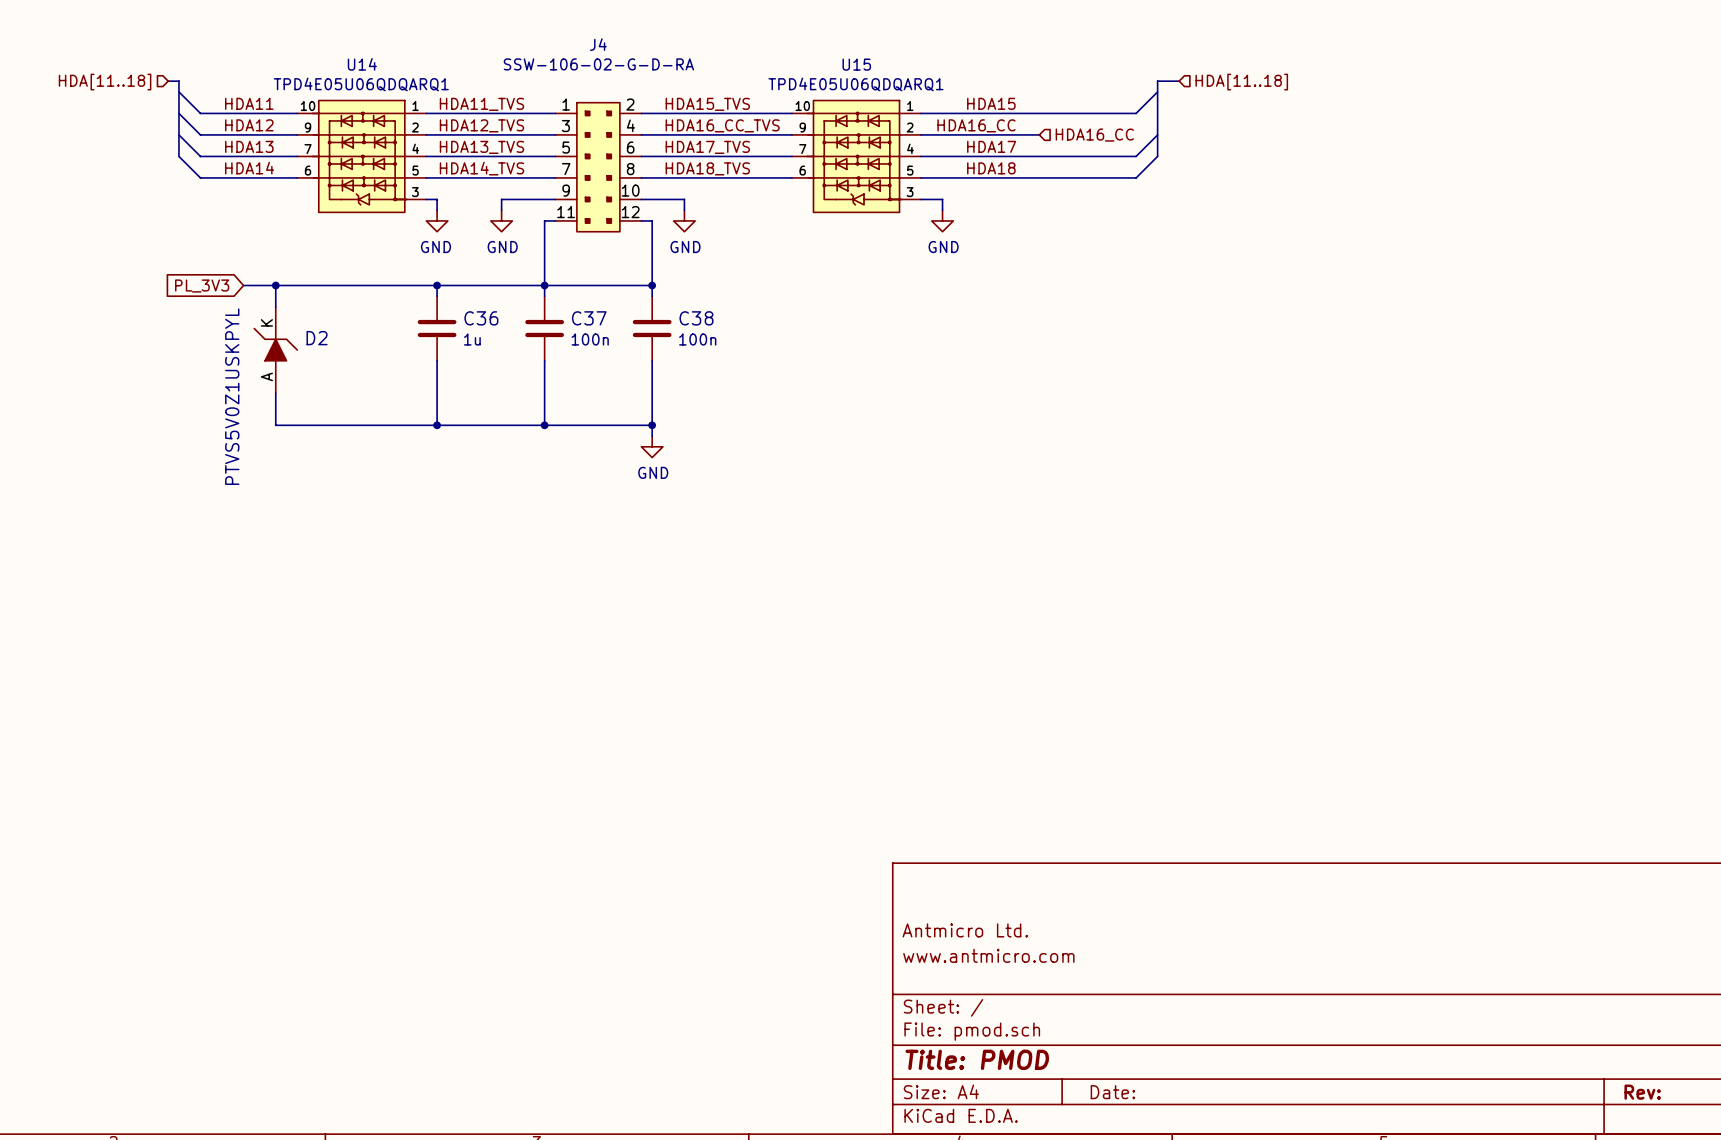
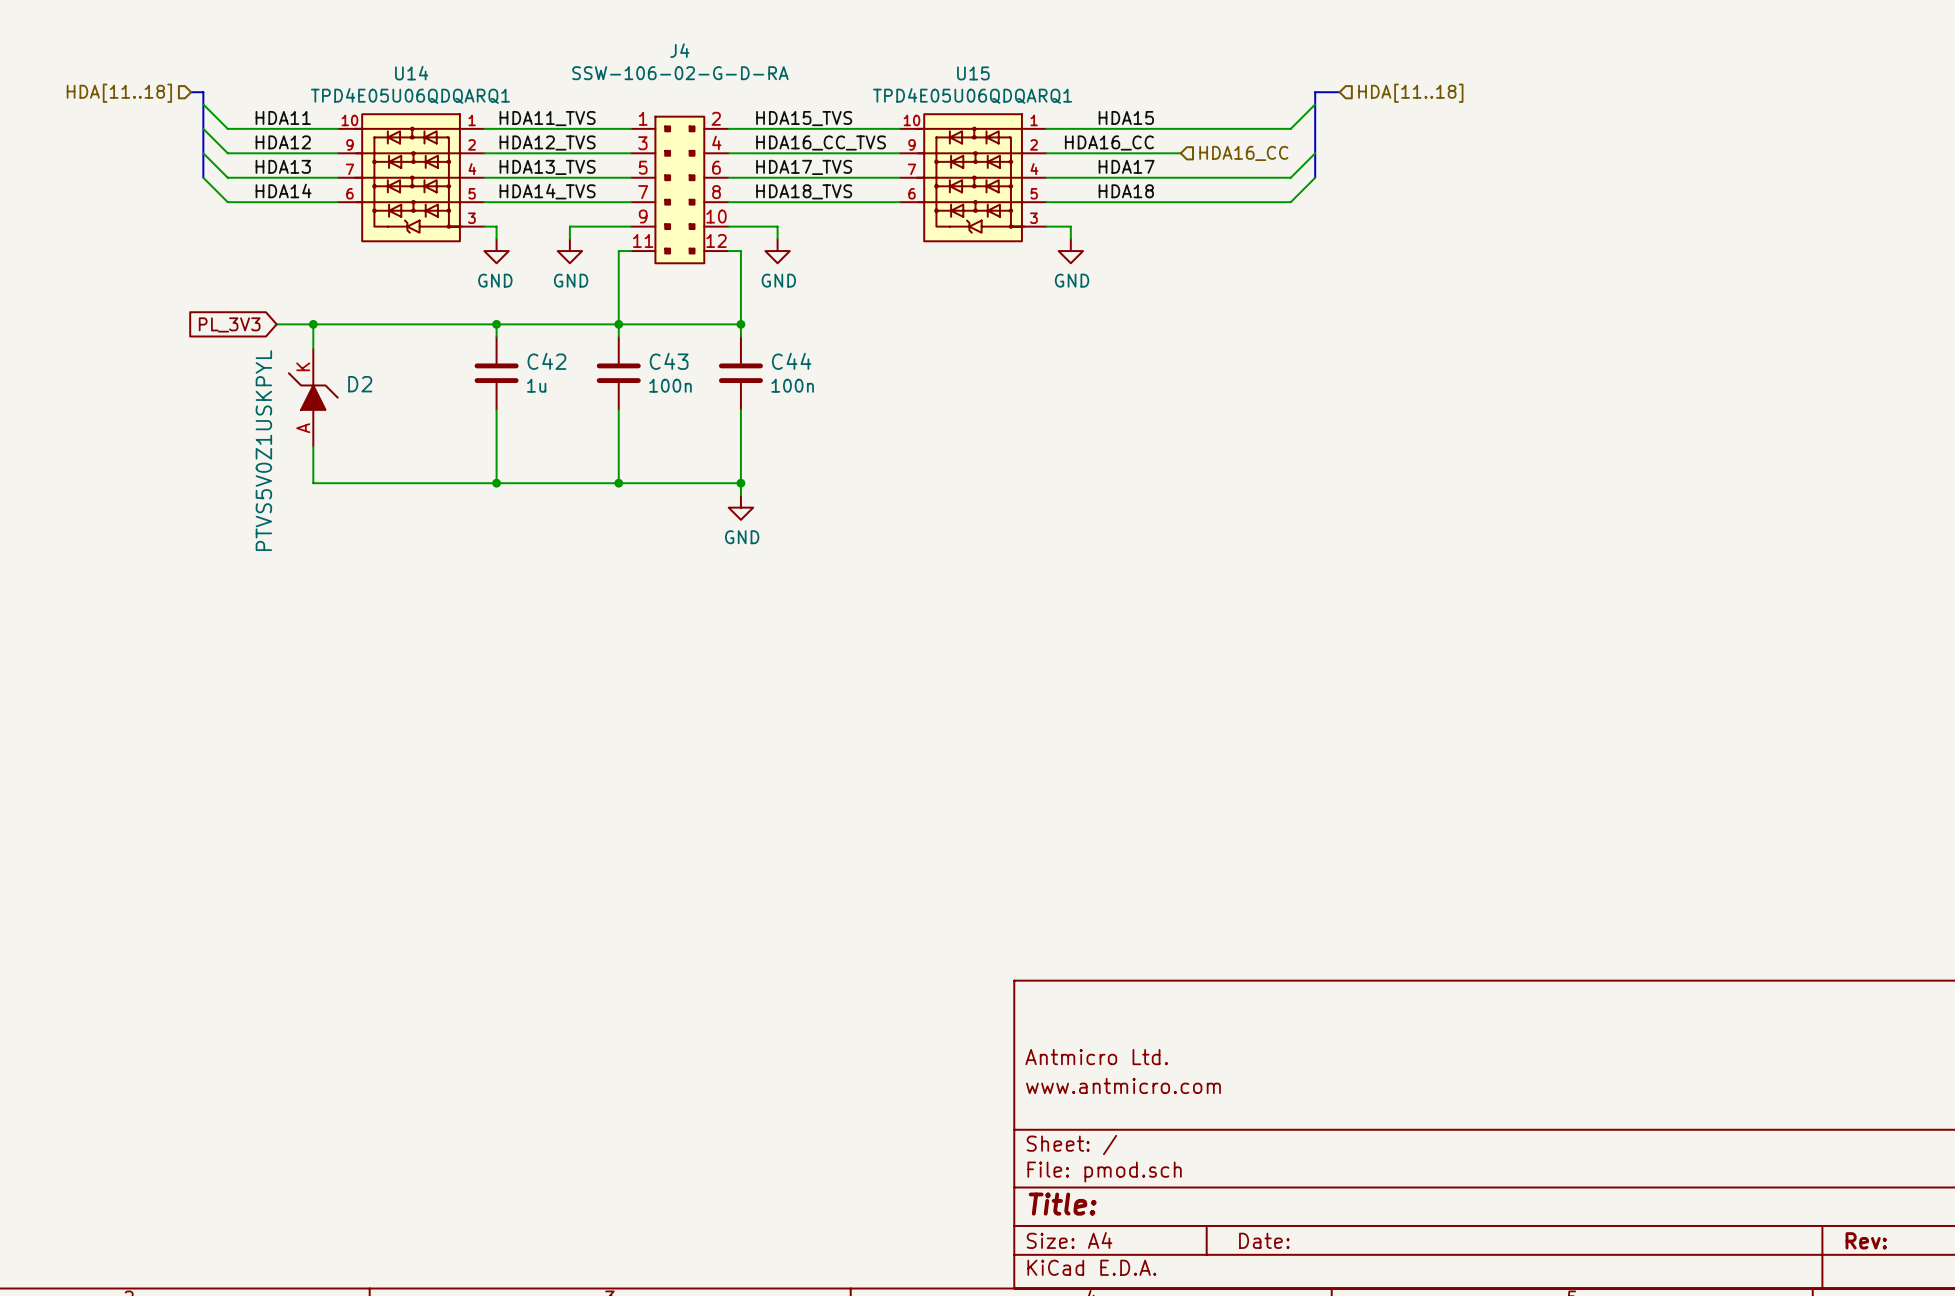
C36 name: C36 (481, 318) -> C42 (546, 361)
C37 name: C37 (589, 318) -> C43 (669, 361)
C38 name: C38 (696, 318) -> C44 (791, 361)
title block: Title: PMOD (977, 1059) -> Title: (1062, 1204)

